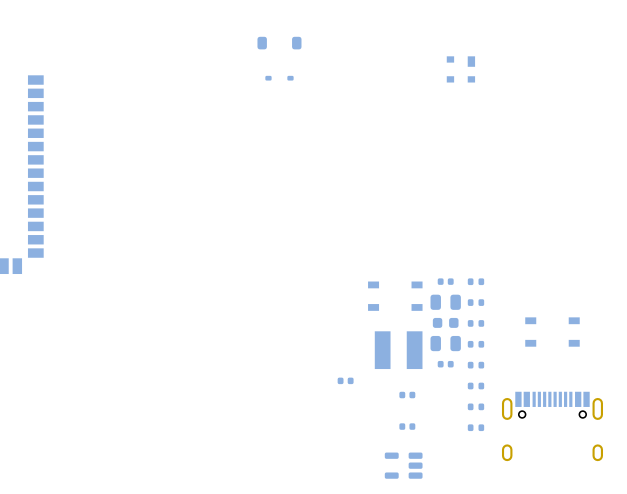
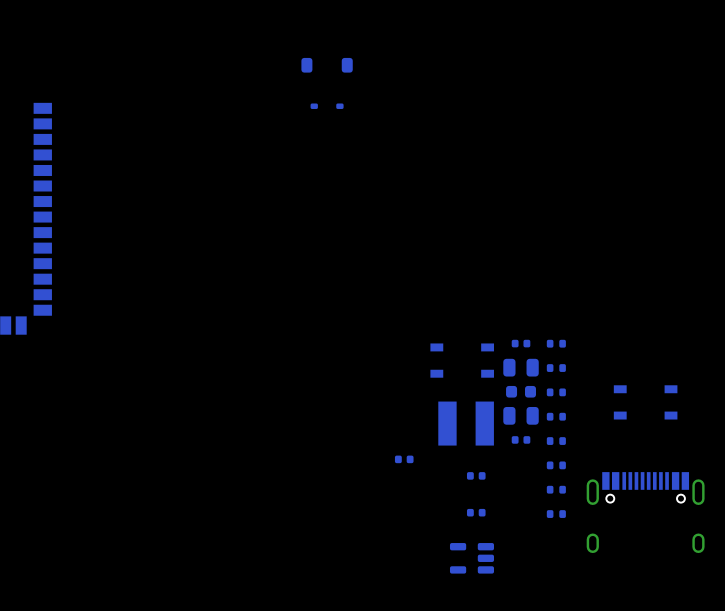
part: (460, 69) -> none

